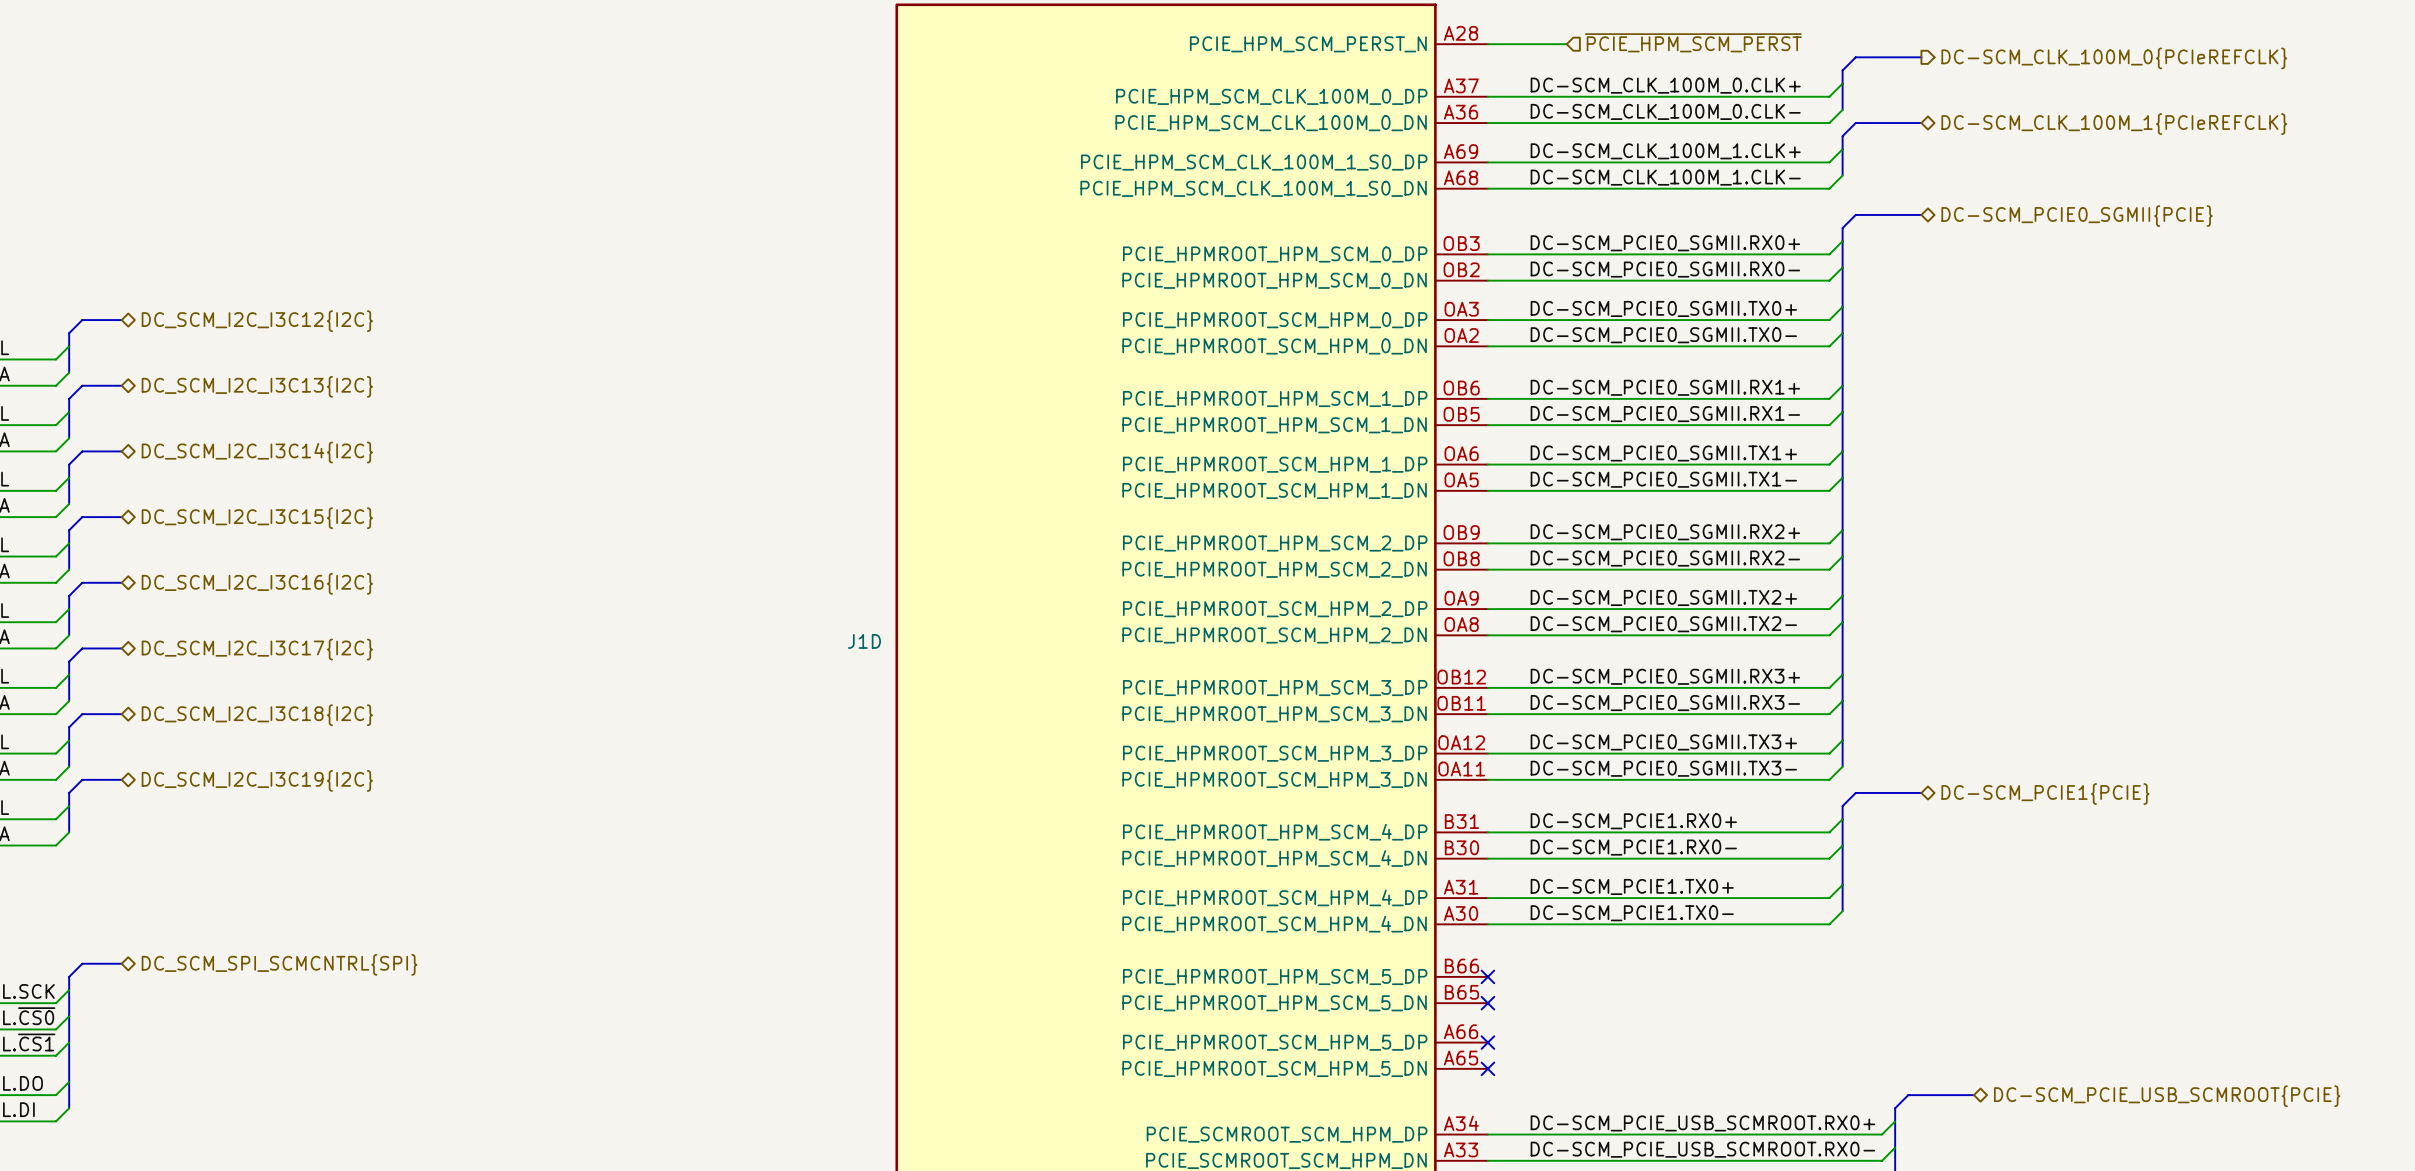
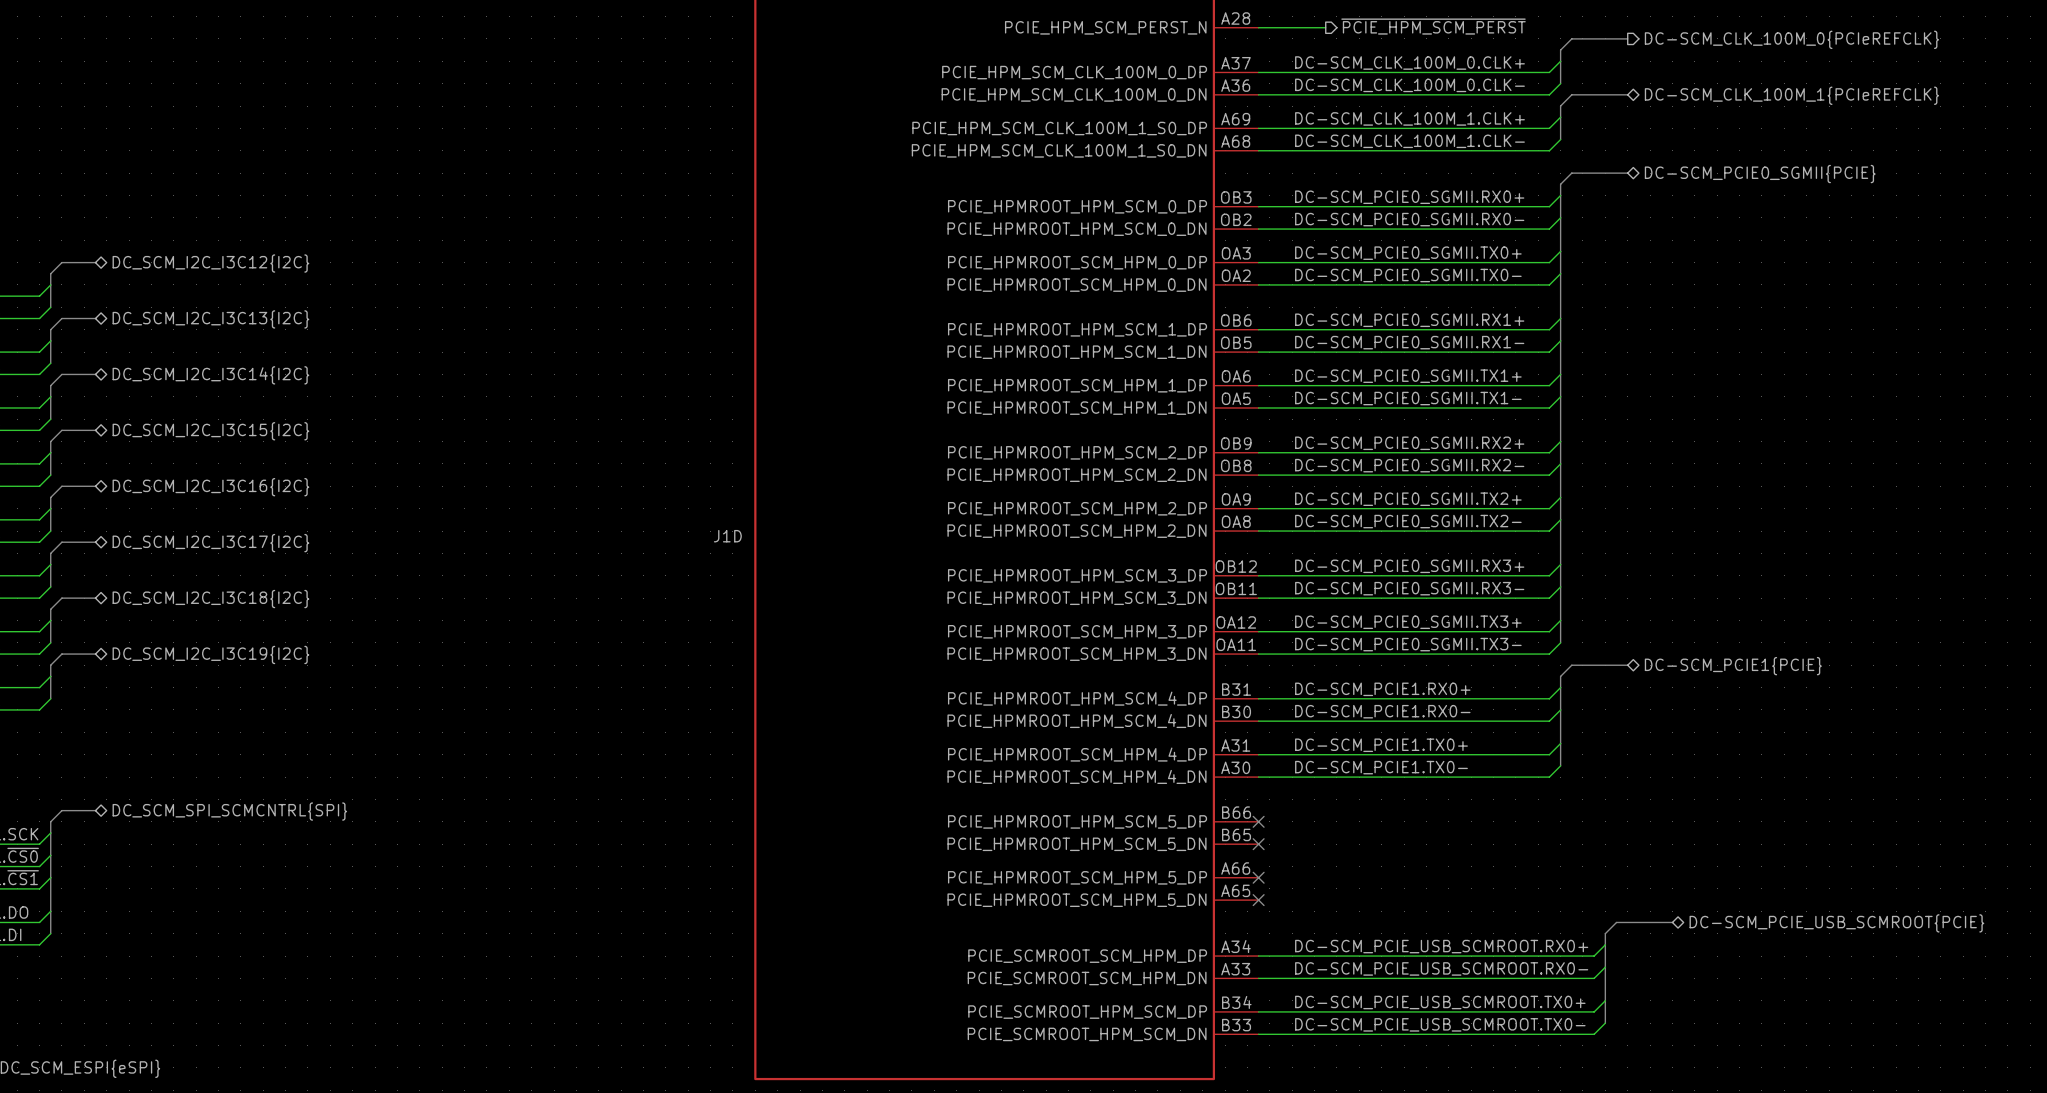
hierarchical label shape: input (1693, 42) -> output (1433, 26)

